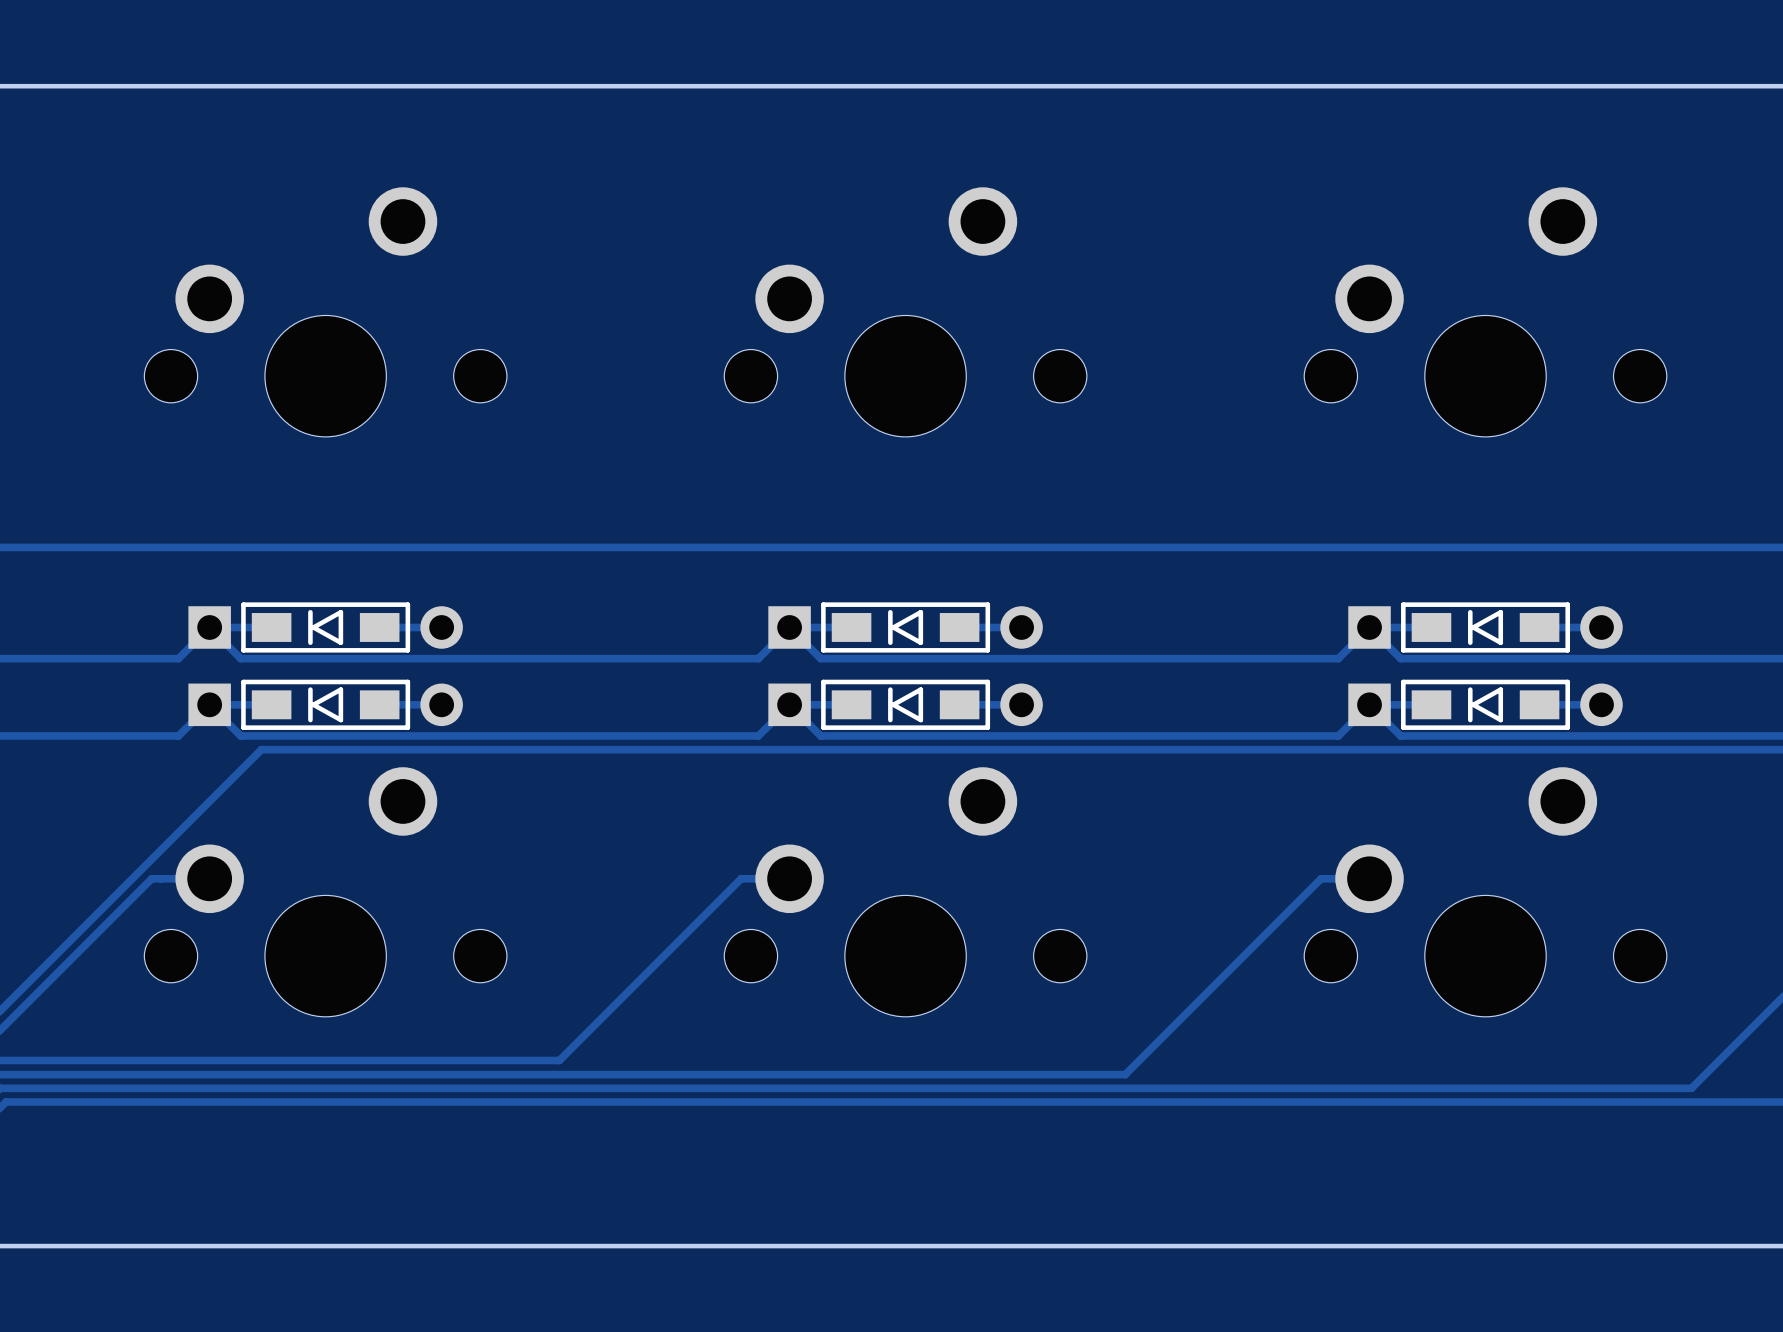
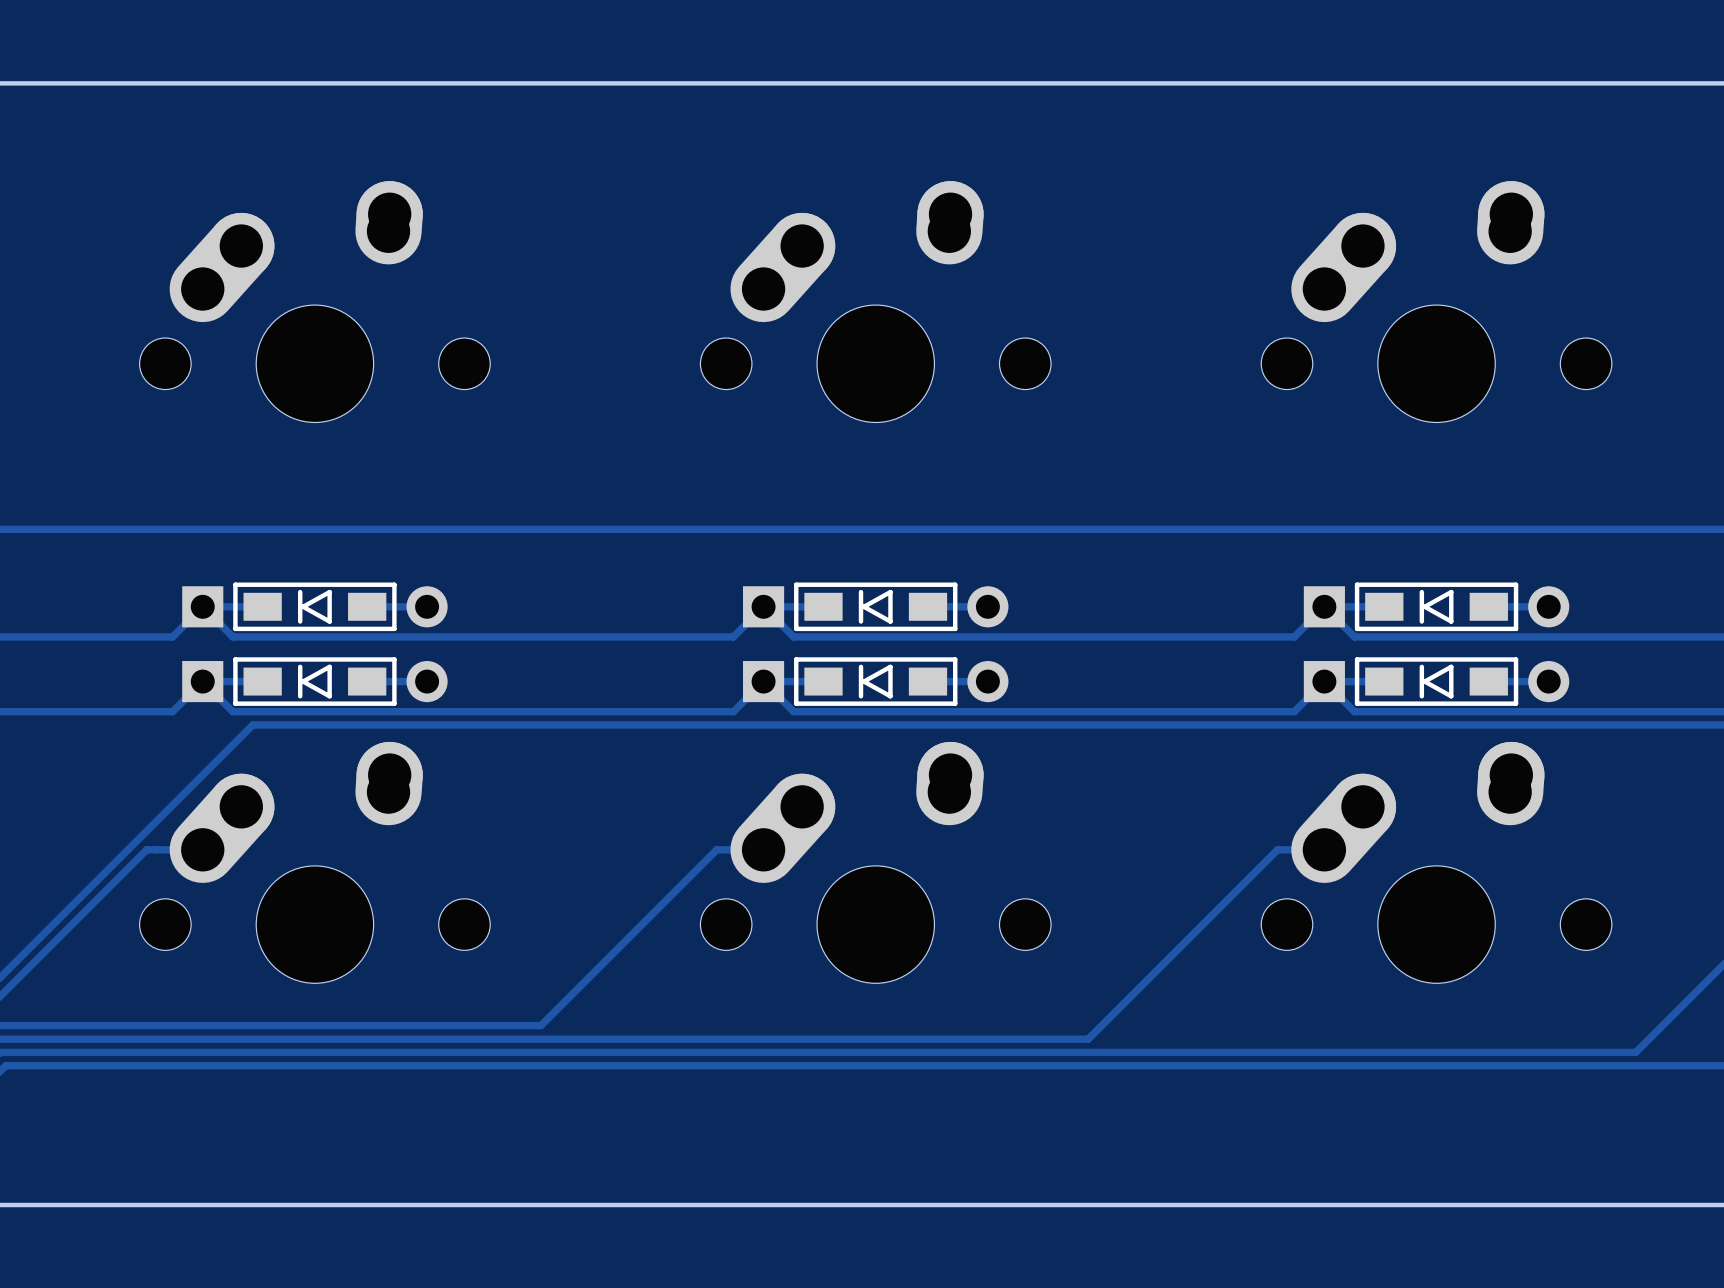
part footprint: [144, 187, 507, 437] -> [139, 181, 491, 423]
part footprint: [724, 187, 1087, 437] -> [700, 181, 1052, 423]
part footprint: [1304, 187, 1667, 437] -> [1261, 181, 1612, 423]
part footprint: [144, 767, 507, 1017] -> [139, 741, 491, 984]
part footprint: [724, 767, 1087, 1017] -> [700, 741, 1052, 984]
part footprint: [1304, 767, 1667, 1017] -> [1261, 741, 1612, 984]

